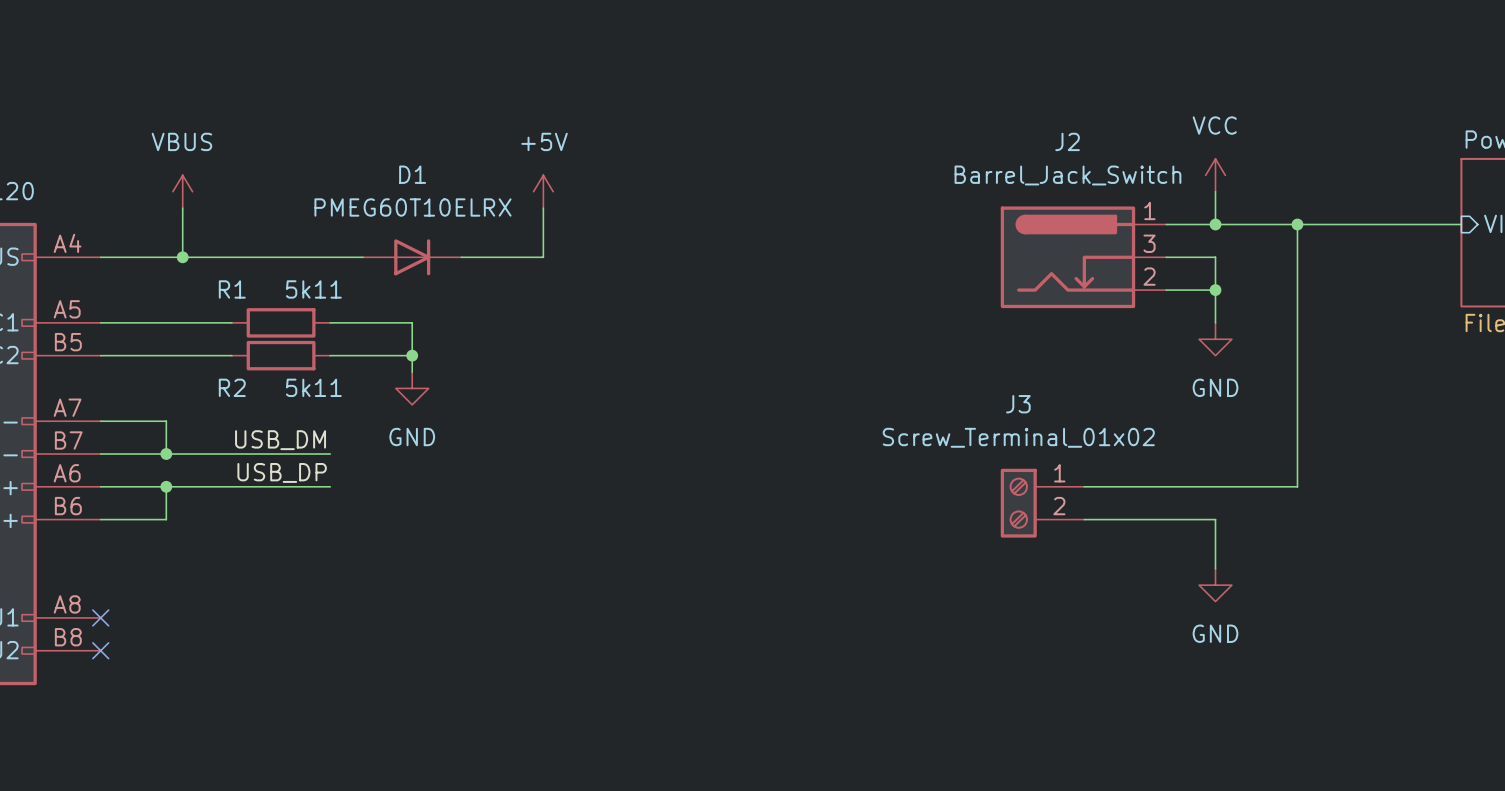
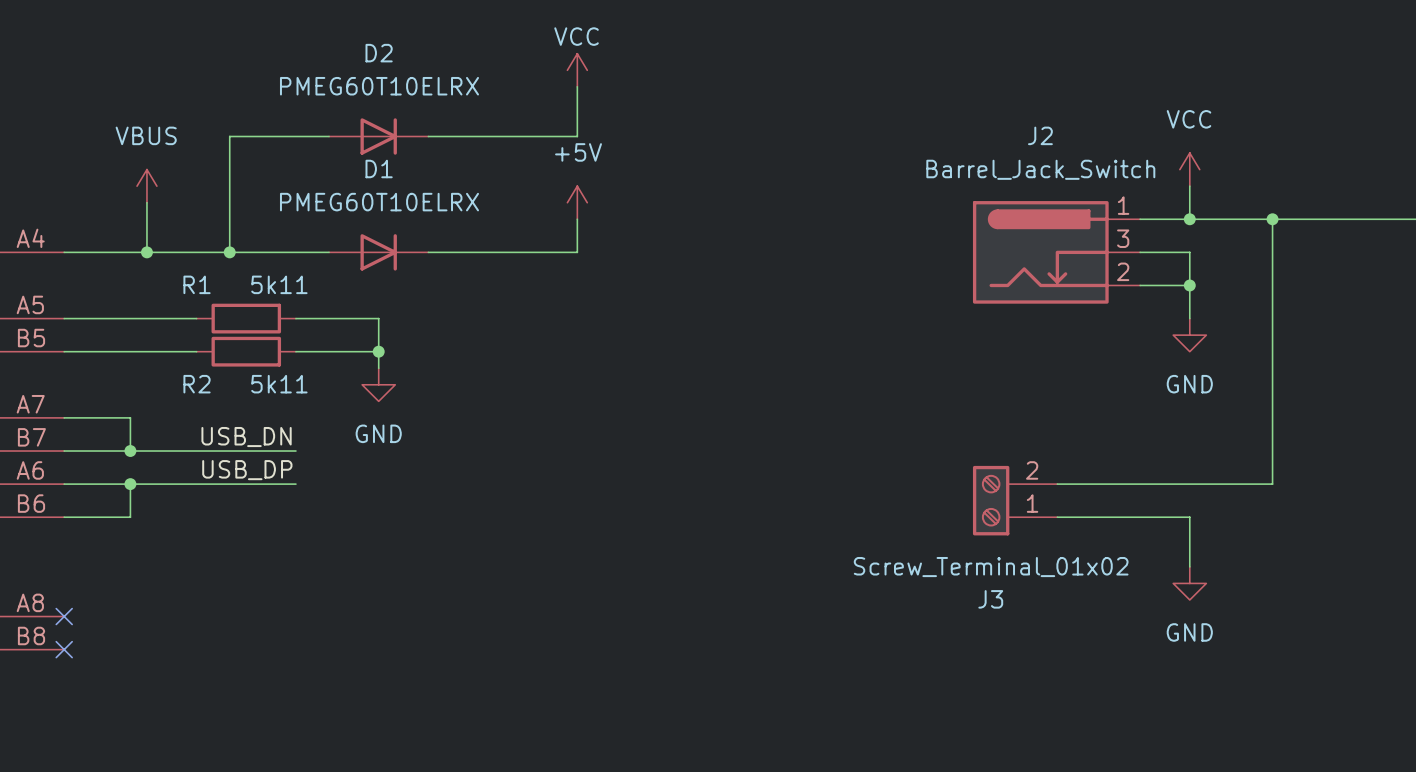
power symbol: none -> VCC (577, 70)
wire: none -> (577, 86) (577, 136) (428, 136)
wire: none -> (329, 136) (229, 136) (229, 252)
D2: none -> PMEG60T10ELRX (378, 136)
power symbol position: +5V (543, 191) -> +5V (577, 202)
wire: (543, 208) (543, 257) -> (577, 219) (577, 252) (511, 252)
junction: none -> (229, 252)
label: USB_DM (280, 440) -> USB_DN (246, 437)
J3 flip: as is (1018, 503) -> up-down (991, 500)

